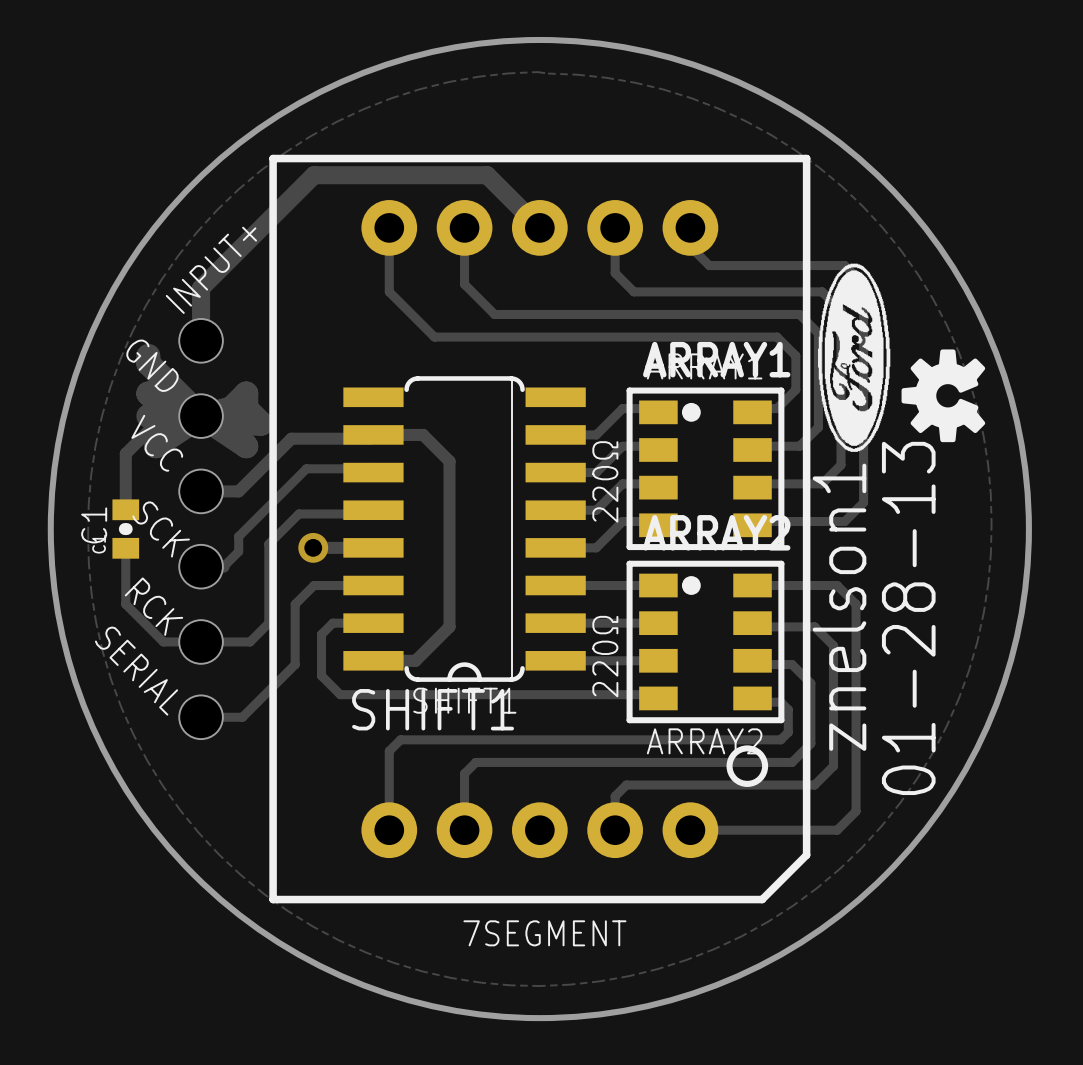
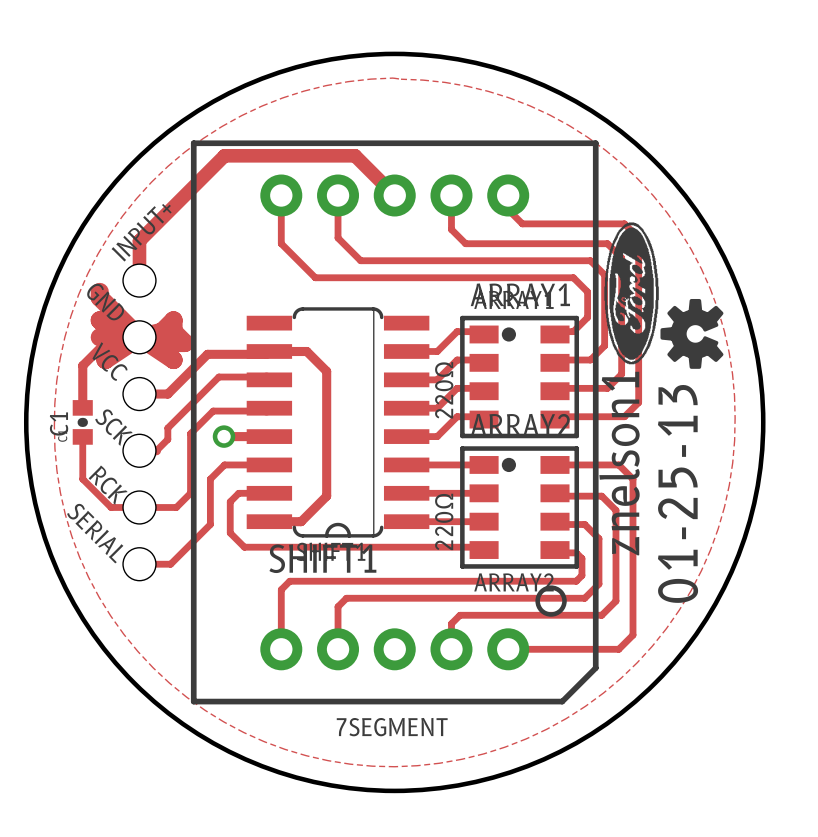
drawing position: (943, 395) -> (691, 333)
text: 01-28-13 (908, 618) -> 01-25-13 (678, 493)

